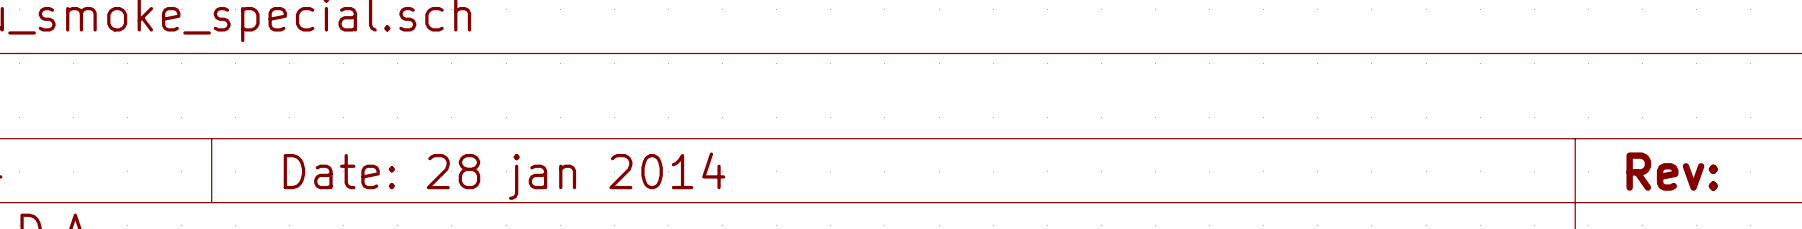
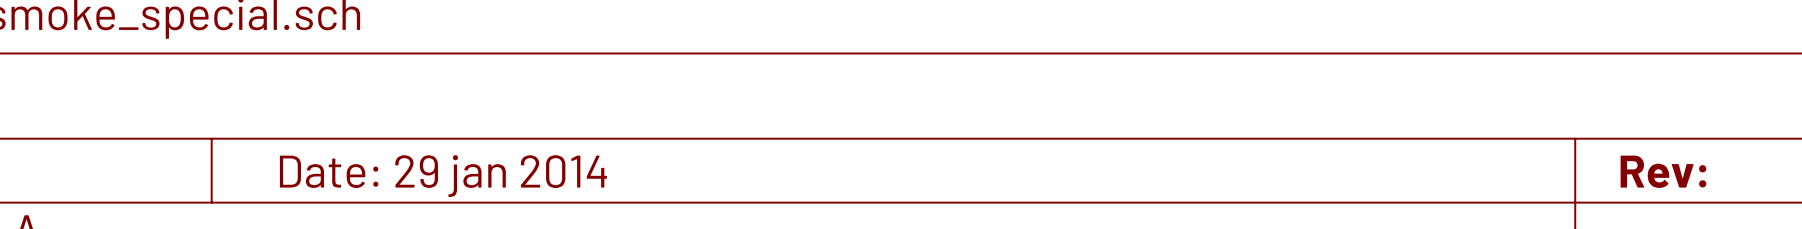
title block: Date: 28 jan 2014 (504, 176) -> Date: 29 jan 2014 (443, 176)

